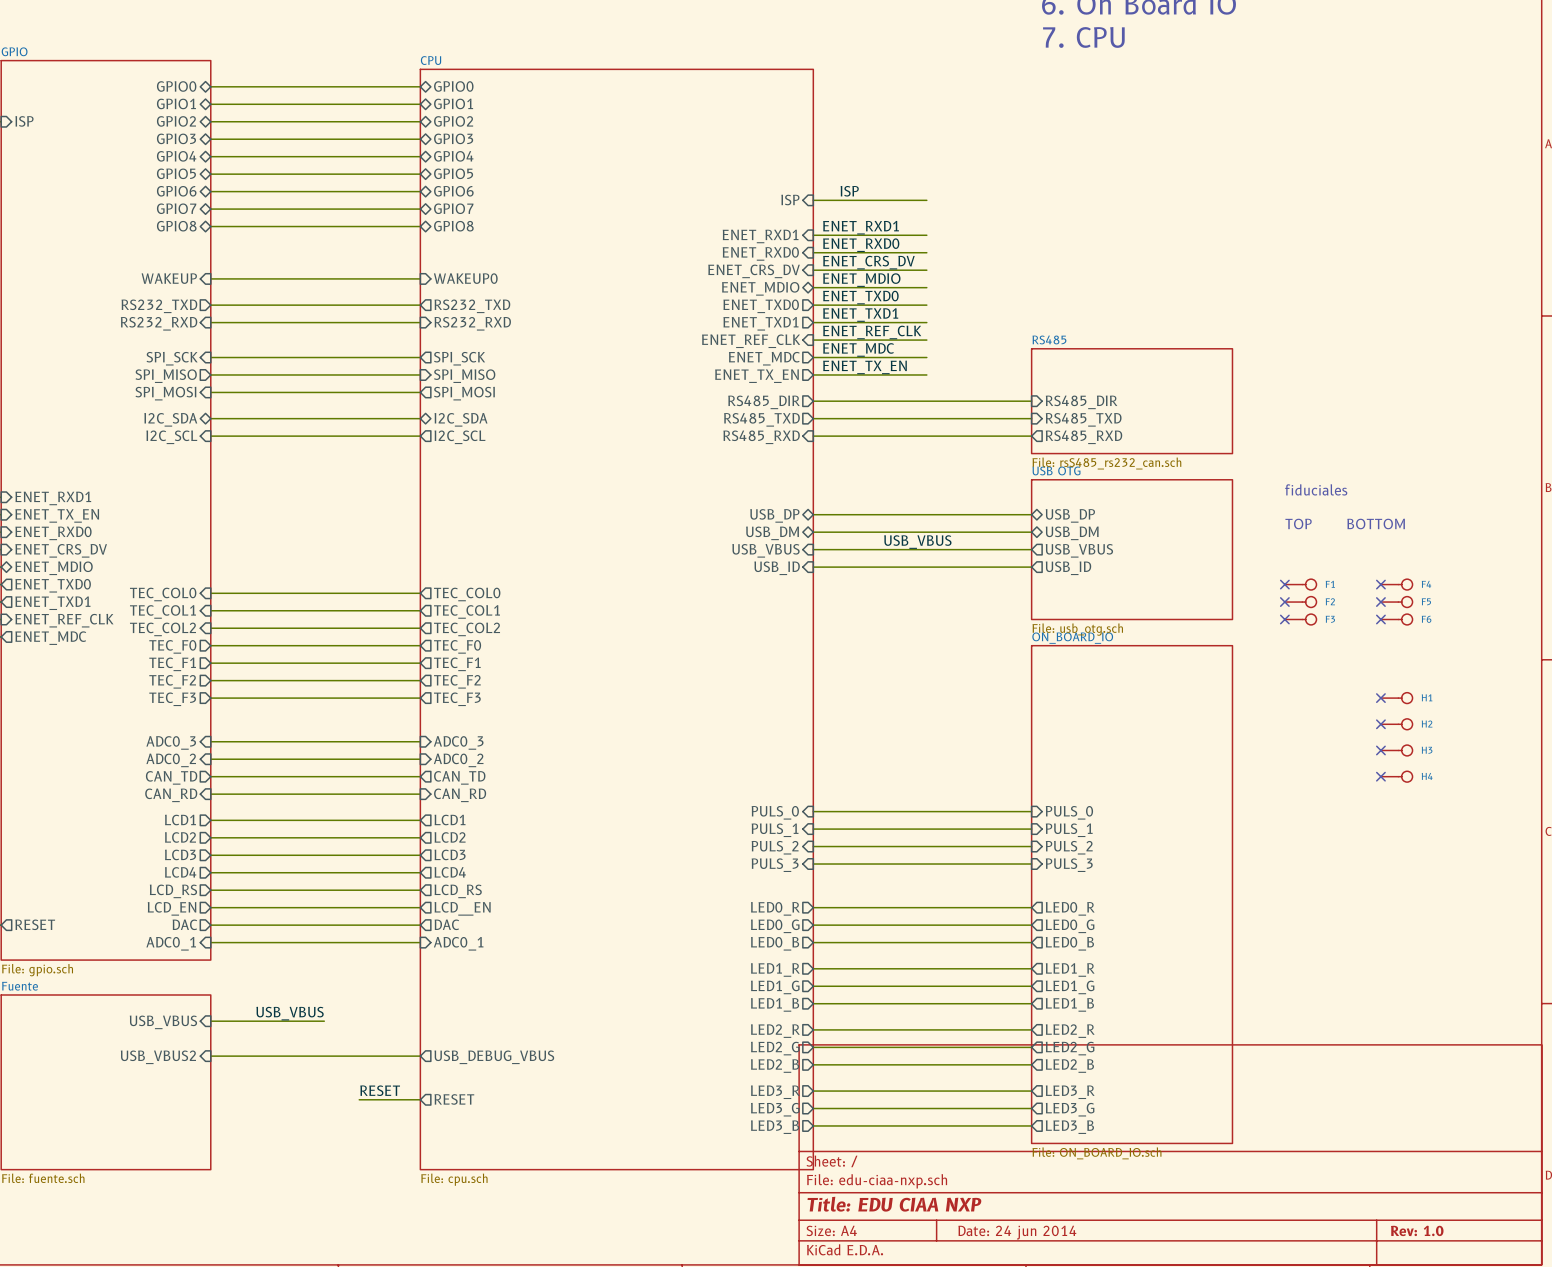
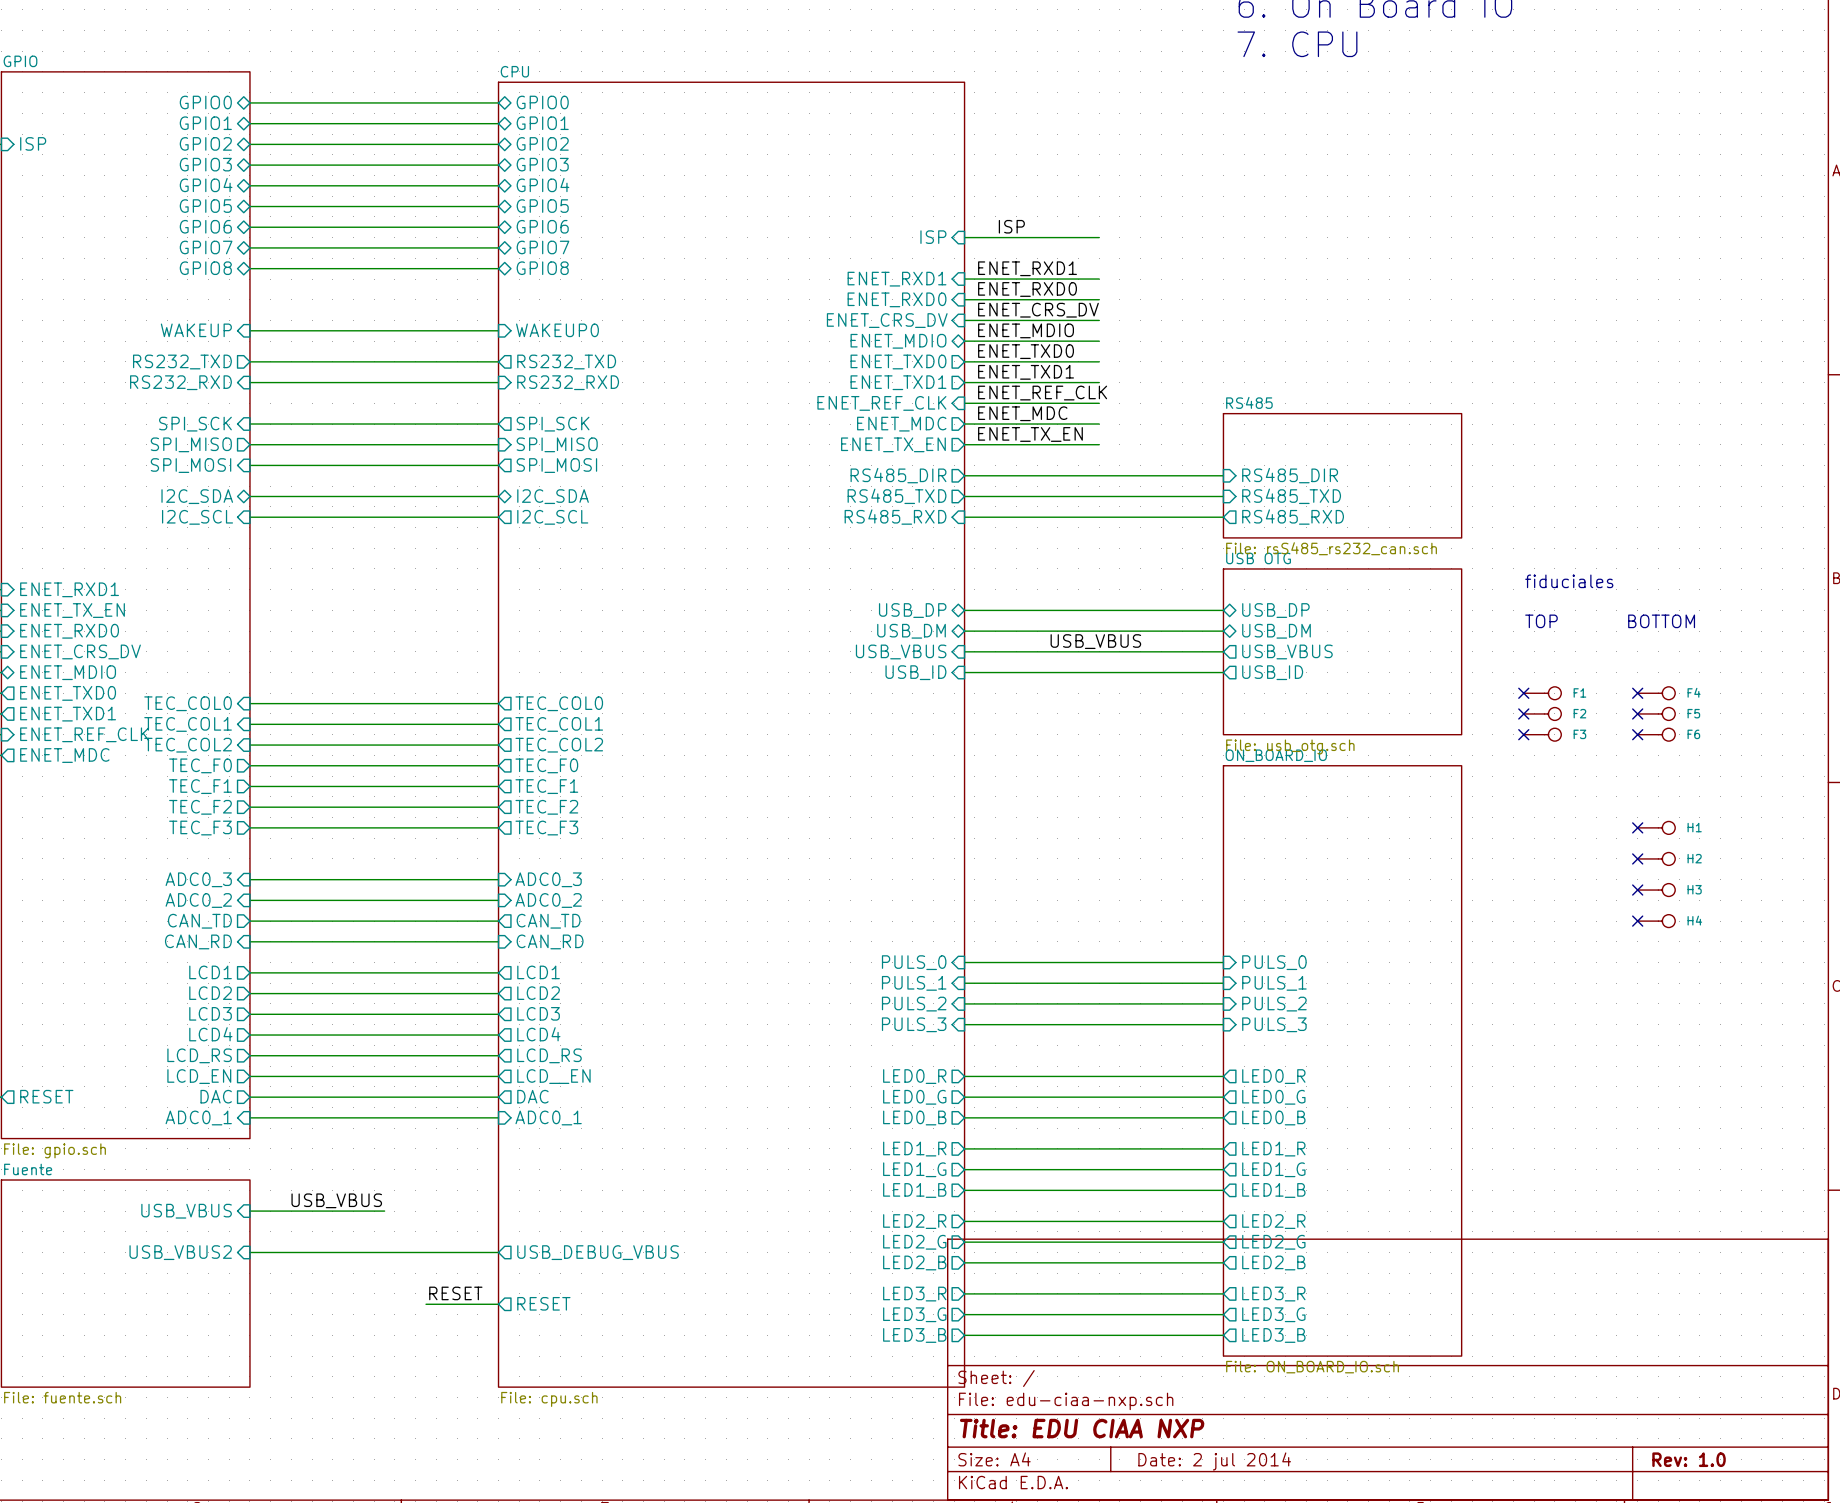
title block: Date: 24 jun 2014 (1017, 1232) -> Date: 2 jul 2014 (1214, 1461)

